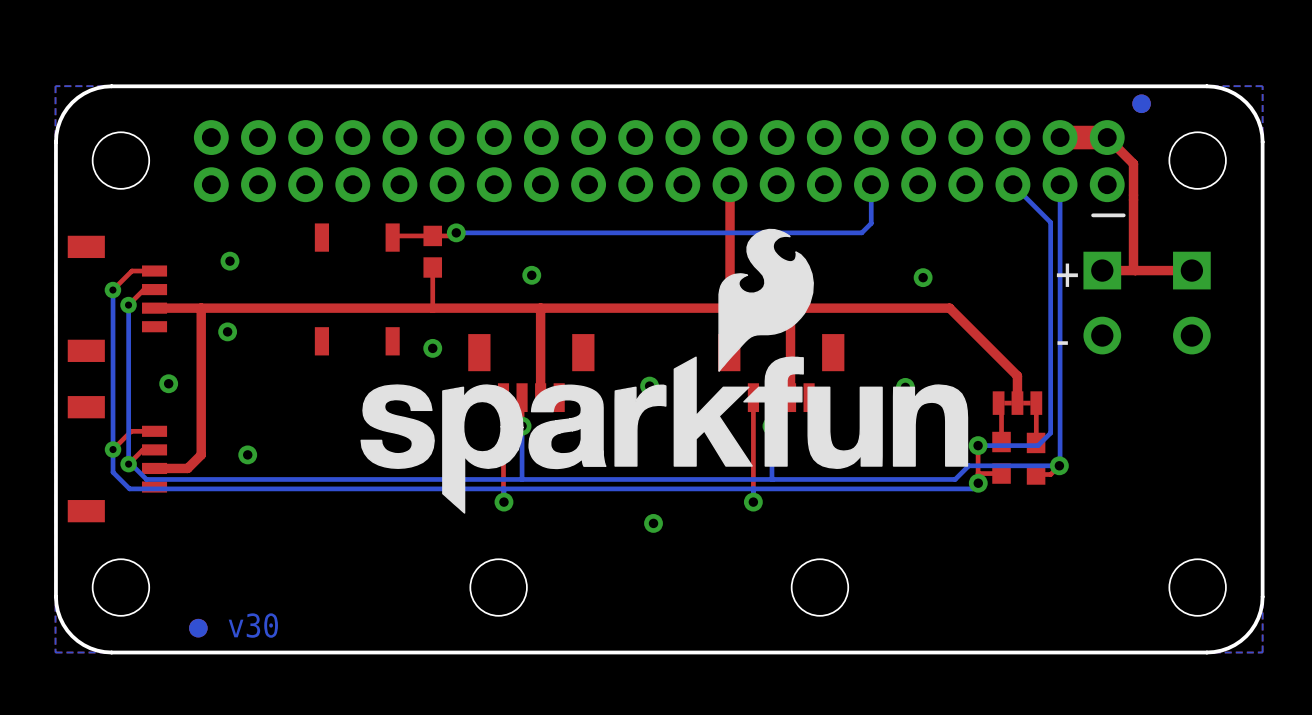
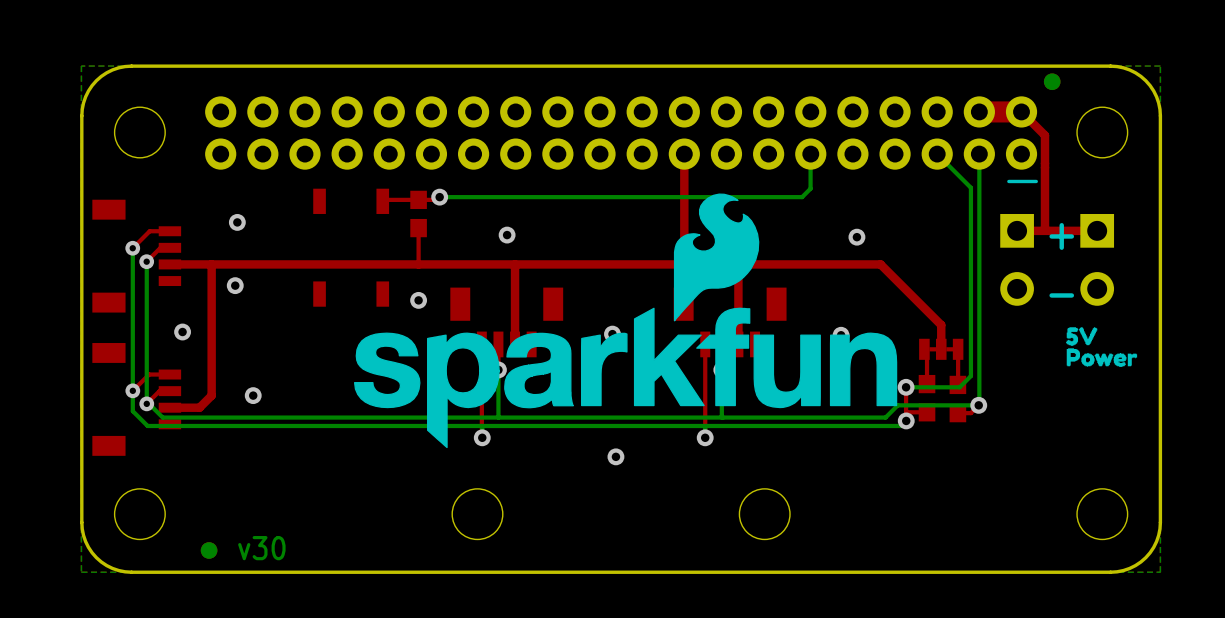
text position: + (1067, 275) -> + (1061, 236)
text position: - (1062, 343) -> - (1061, 295)
drawing: none -> [1066, 327, 1138, 367]

